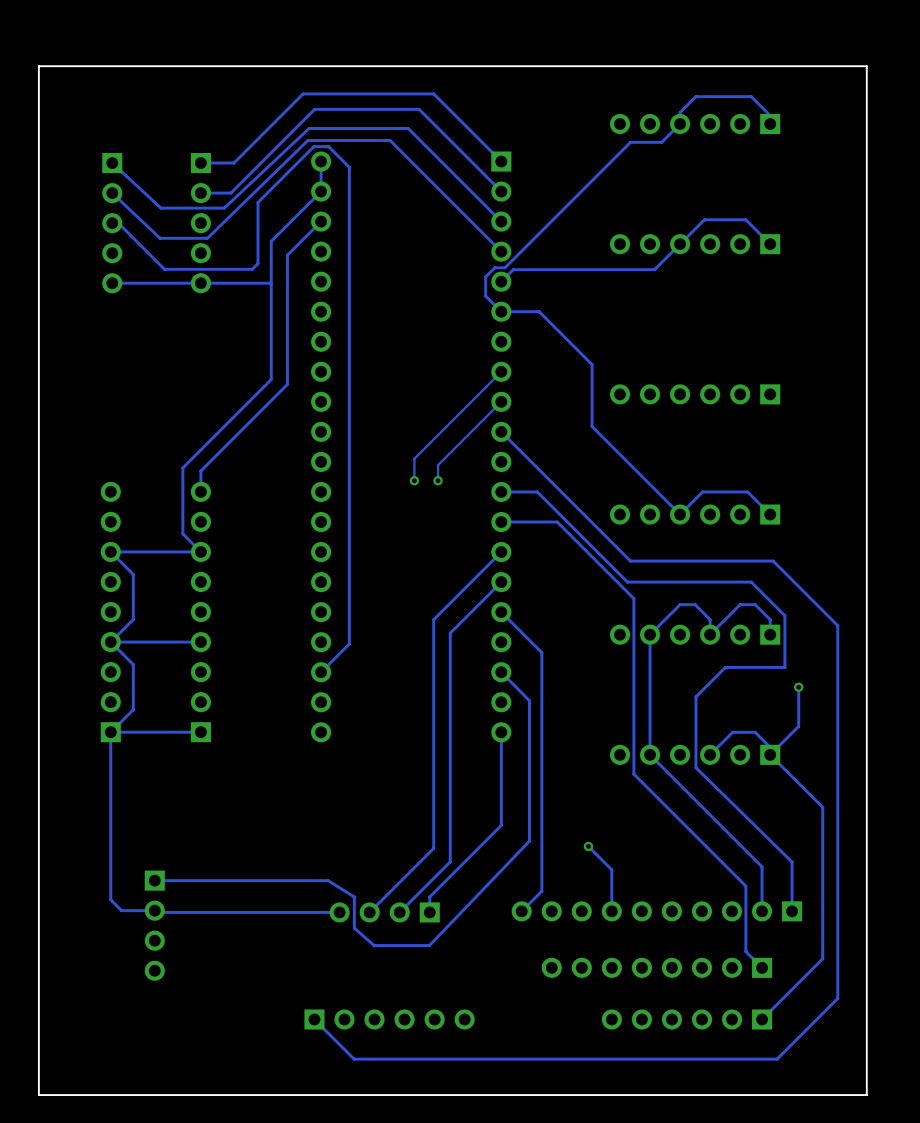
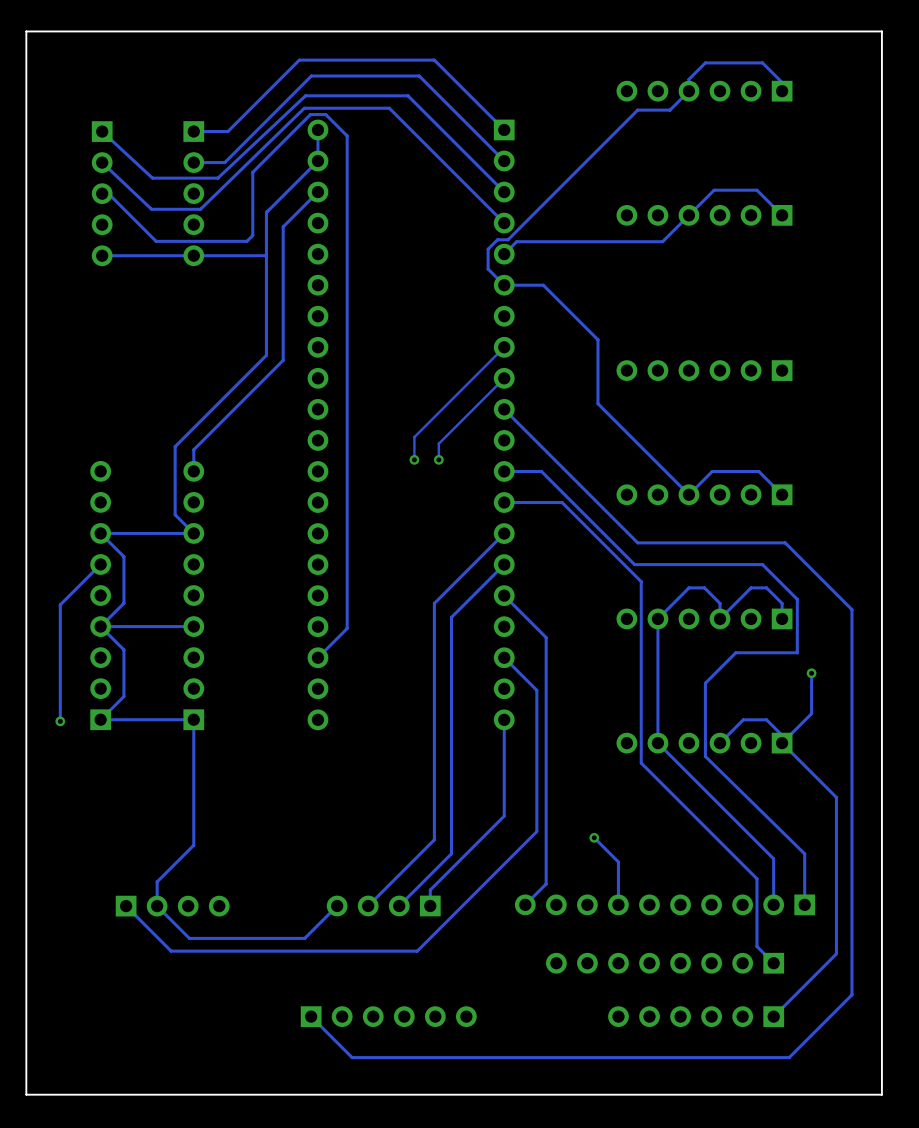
track: none -> (100, 564) (60, 604) (60, 721)
track: (501, 672) (529, 700) (529, 841) (429, 945) (374, 945) (354, 928) (354, 897) (328, 880) (154, 880) -> (504, 657) (536, 690) (536, 831) (417, 951) (171, 951) (126, 906)
track: (110, 732) (110, 899) (121, 910) (339, 912) -> (193, 719) (193, 845) (157, 881) (157, 906) (189, 938) (304, 938) (337, 905)
via: none -> (60, 721)
part rotation: 0° (154, 925) -> 90° counterclockwise (172, 906)

